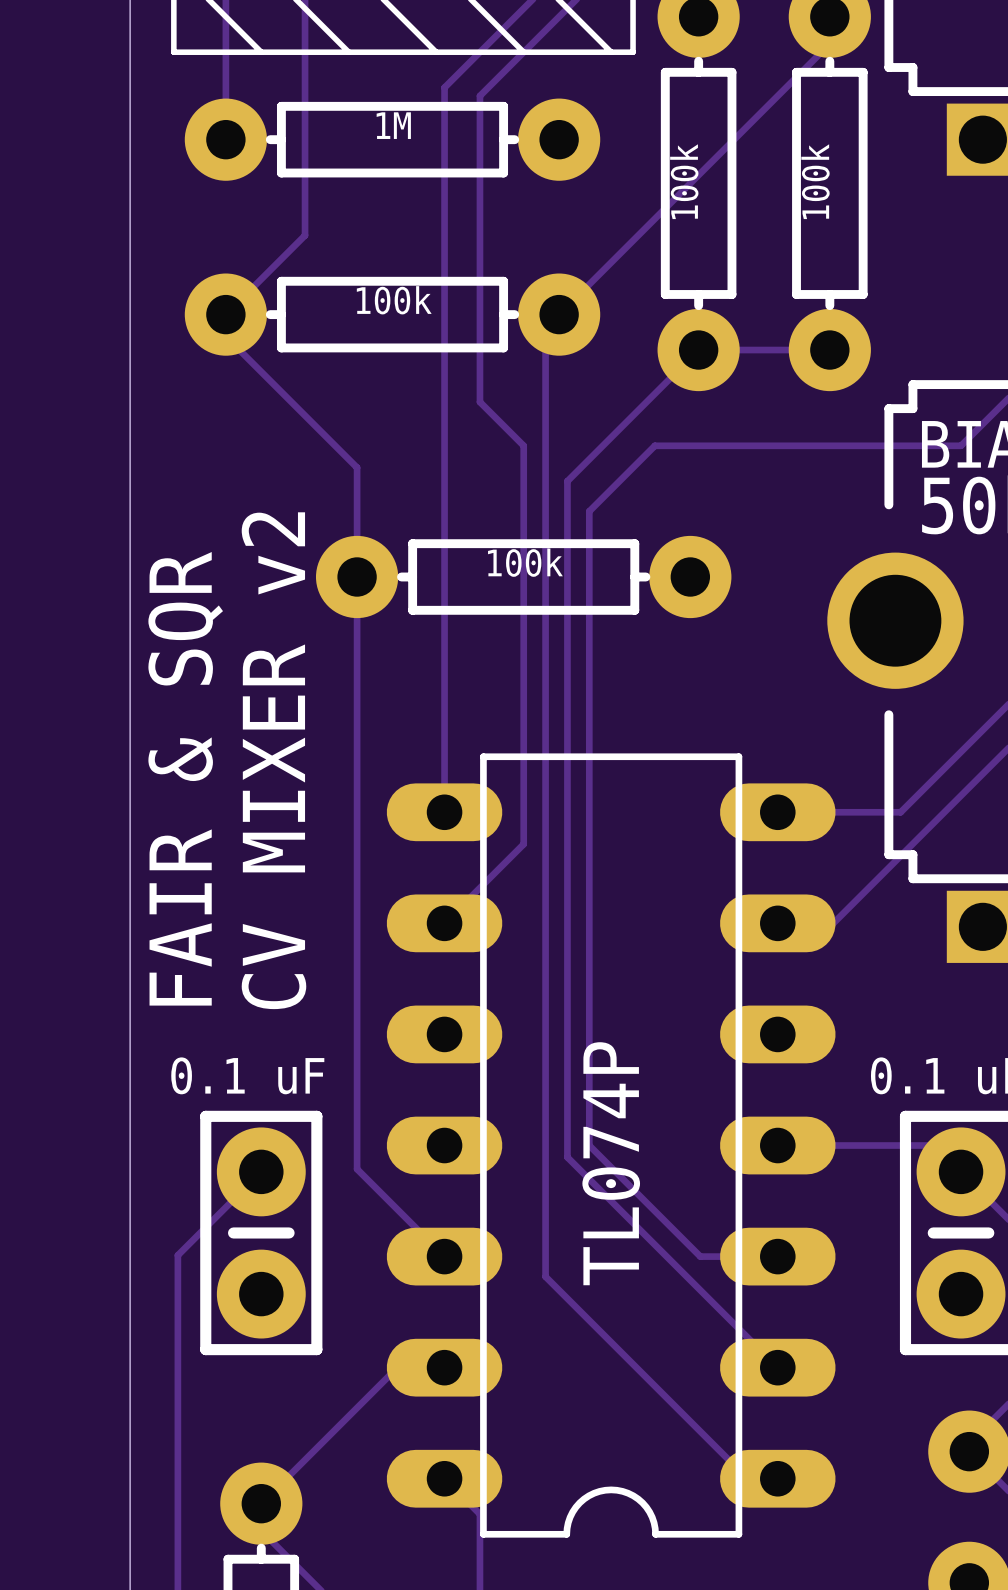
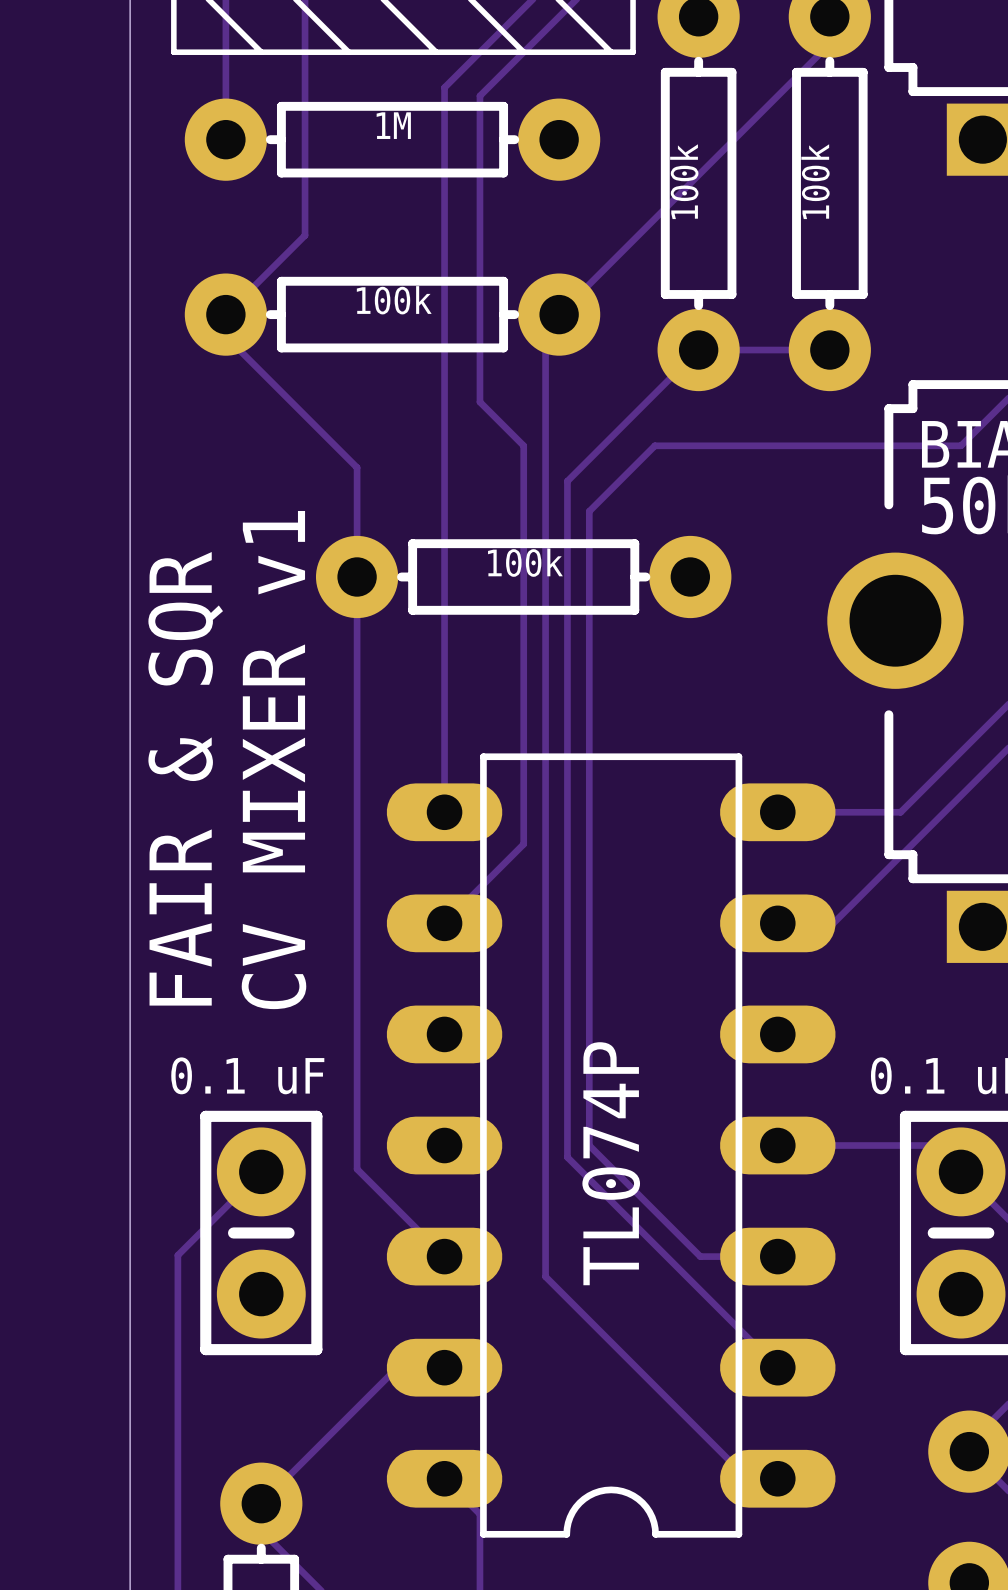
text: CV MIXER v2 (273, 760) -> CV MIXER v1 (273, 760)

